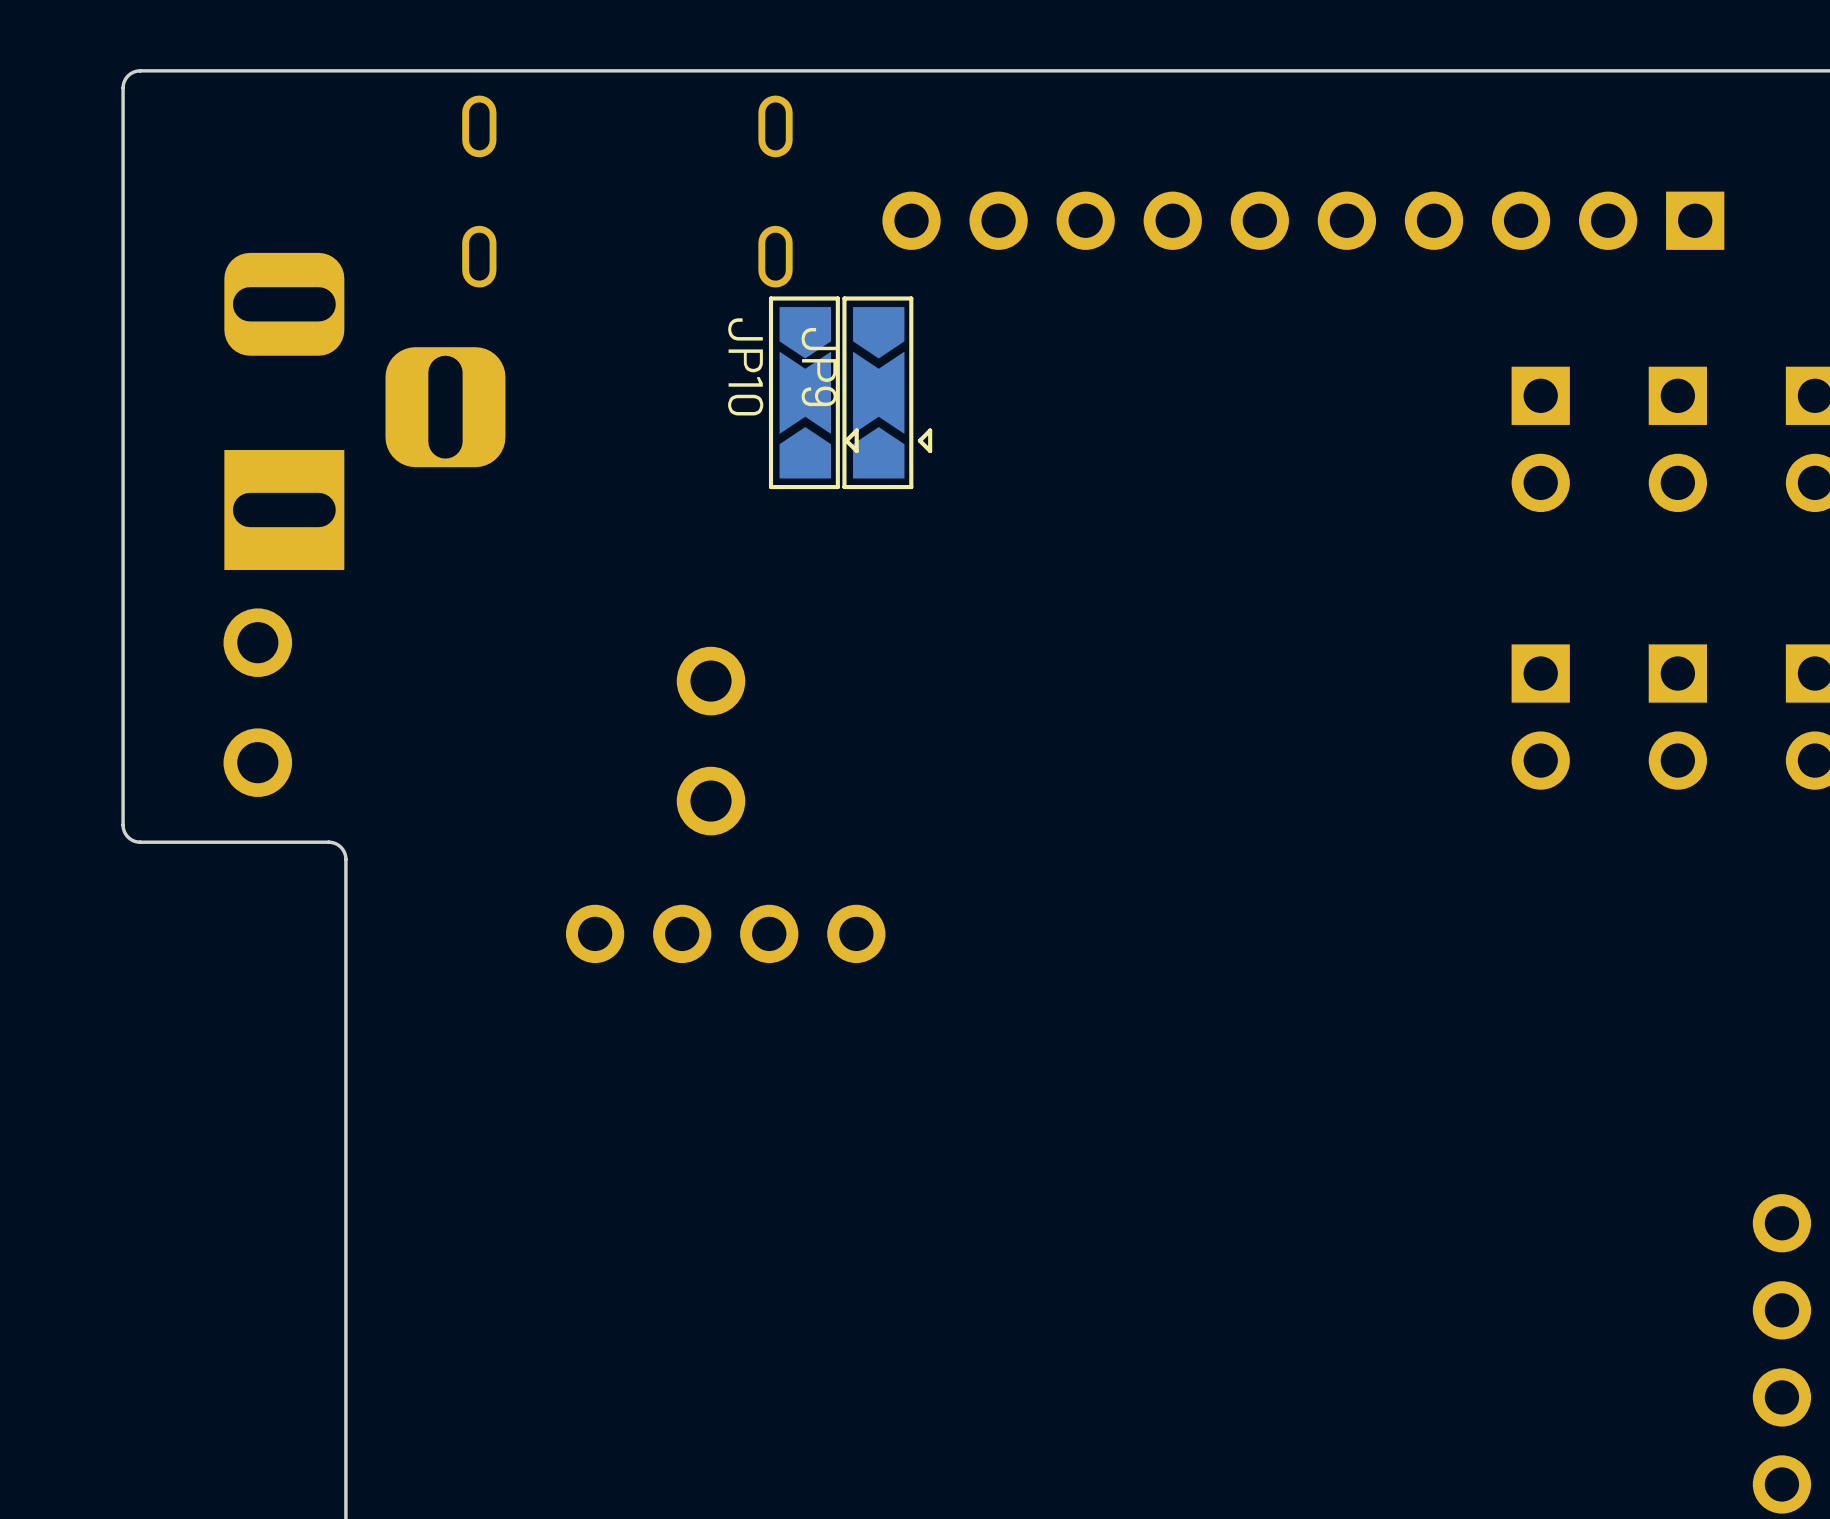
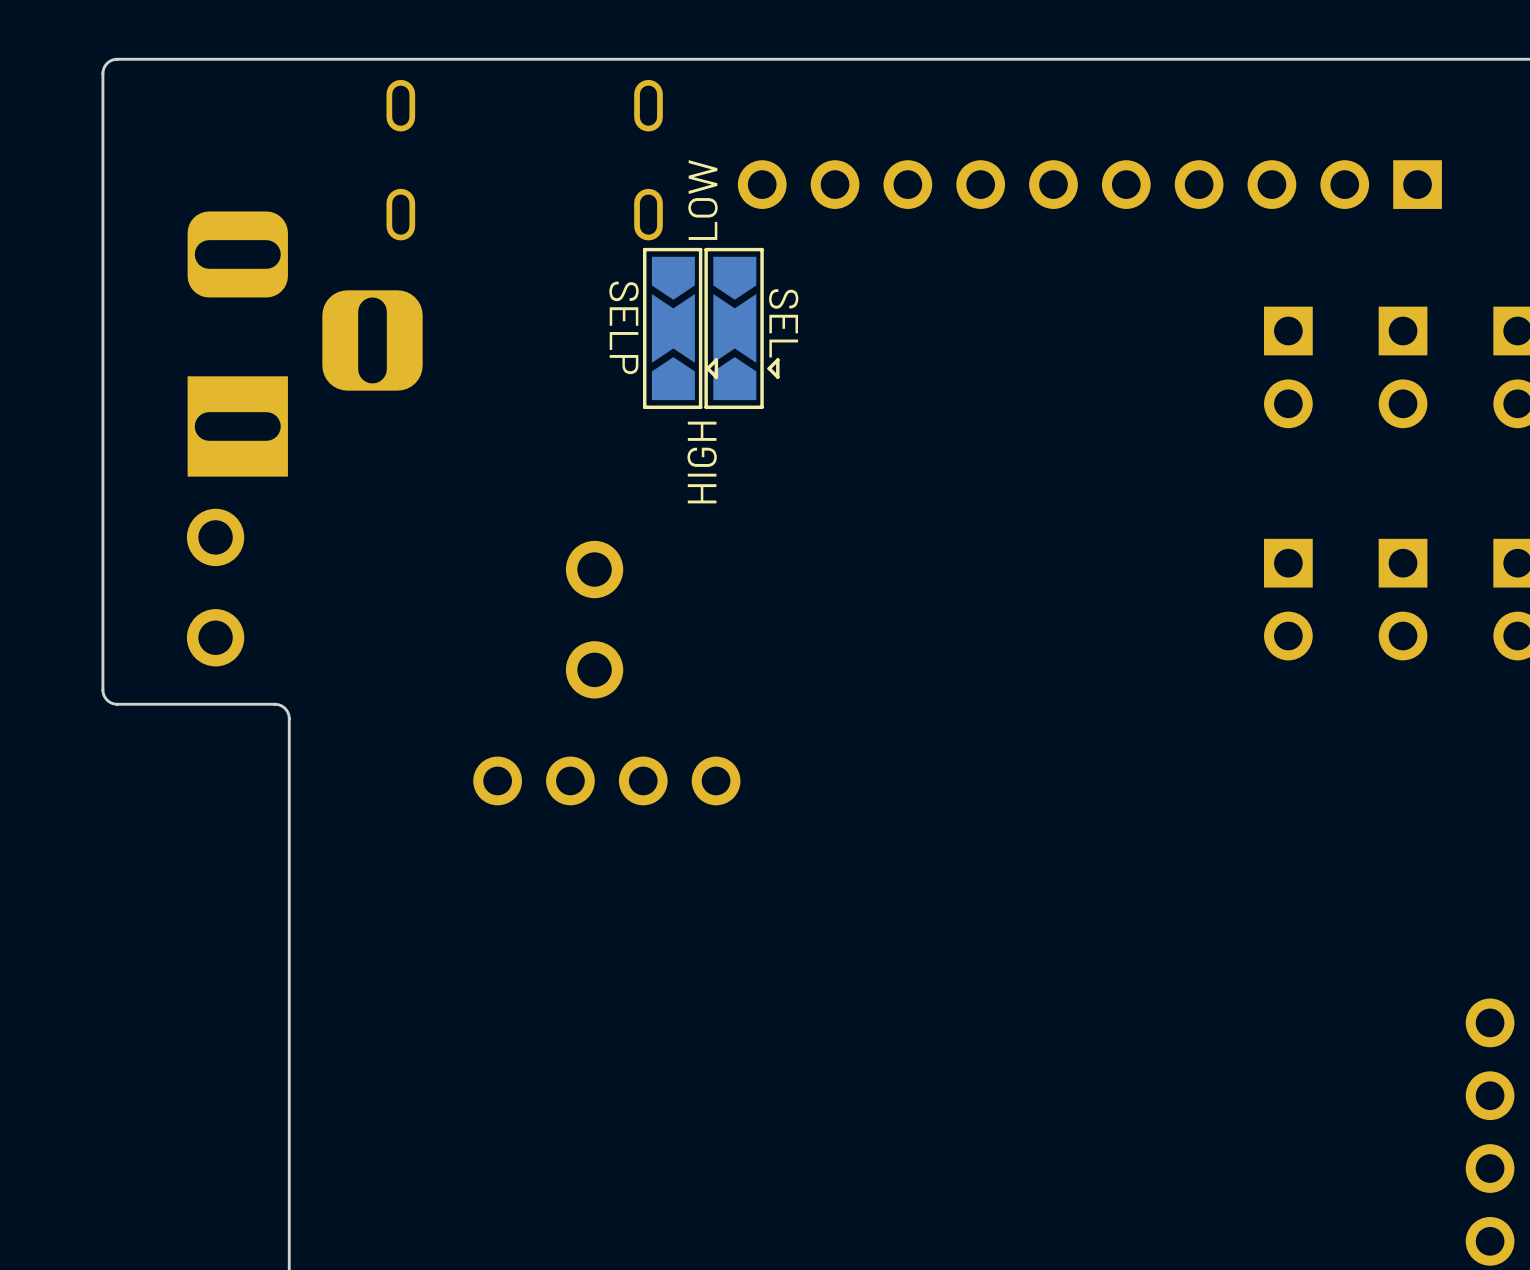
text: none -> LOW (702, 200)
JP10 name: JP10 (745, 366) -> none
JP9 name: JP9 (819, 367) -> none
text: none -> SEL (783, 323)
text: none -> SELP (624, 327)
text: none -> HIGH (702, 462)

